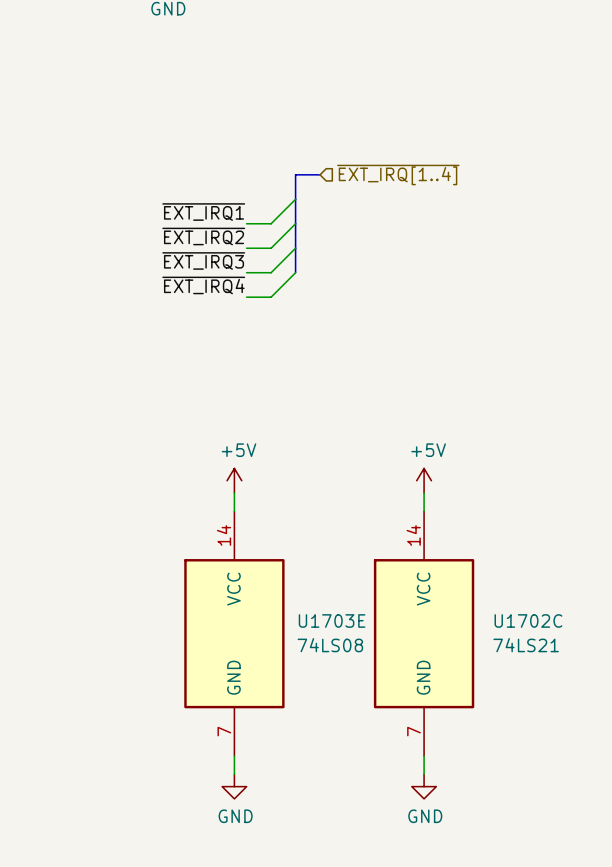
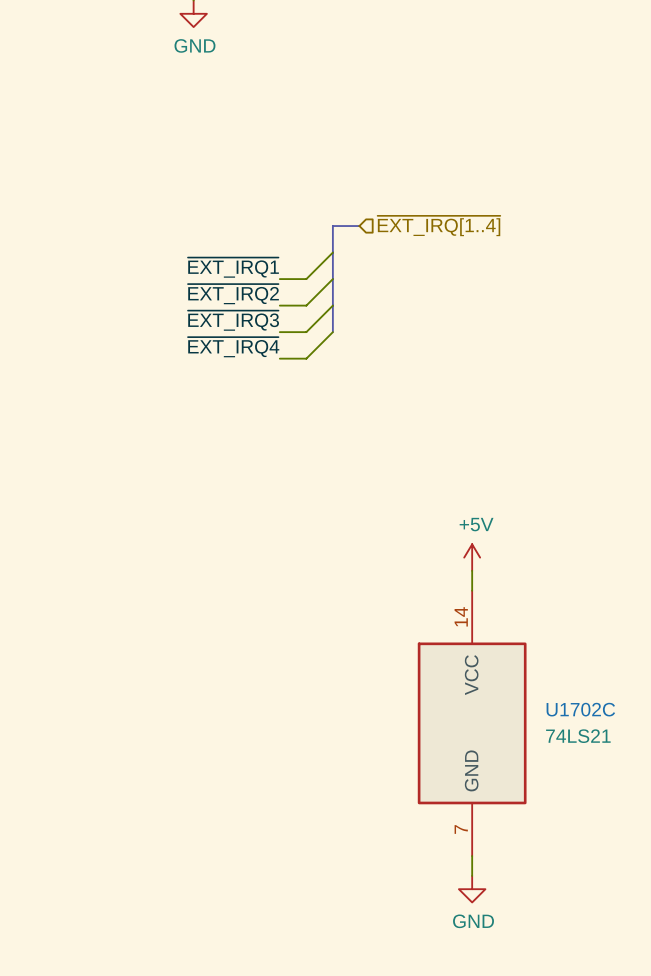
power symbol: +5V (234, 480) -> none
wire: (234, 492) (234, 511) -> none
U1703E: 74LS08 (234, 633) -> none
wire: (234, 756) (234, 774) -> none
power symbol: GND (234, 786) -> none

